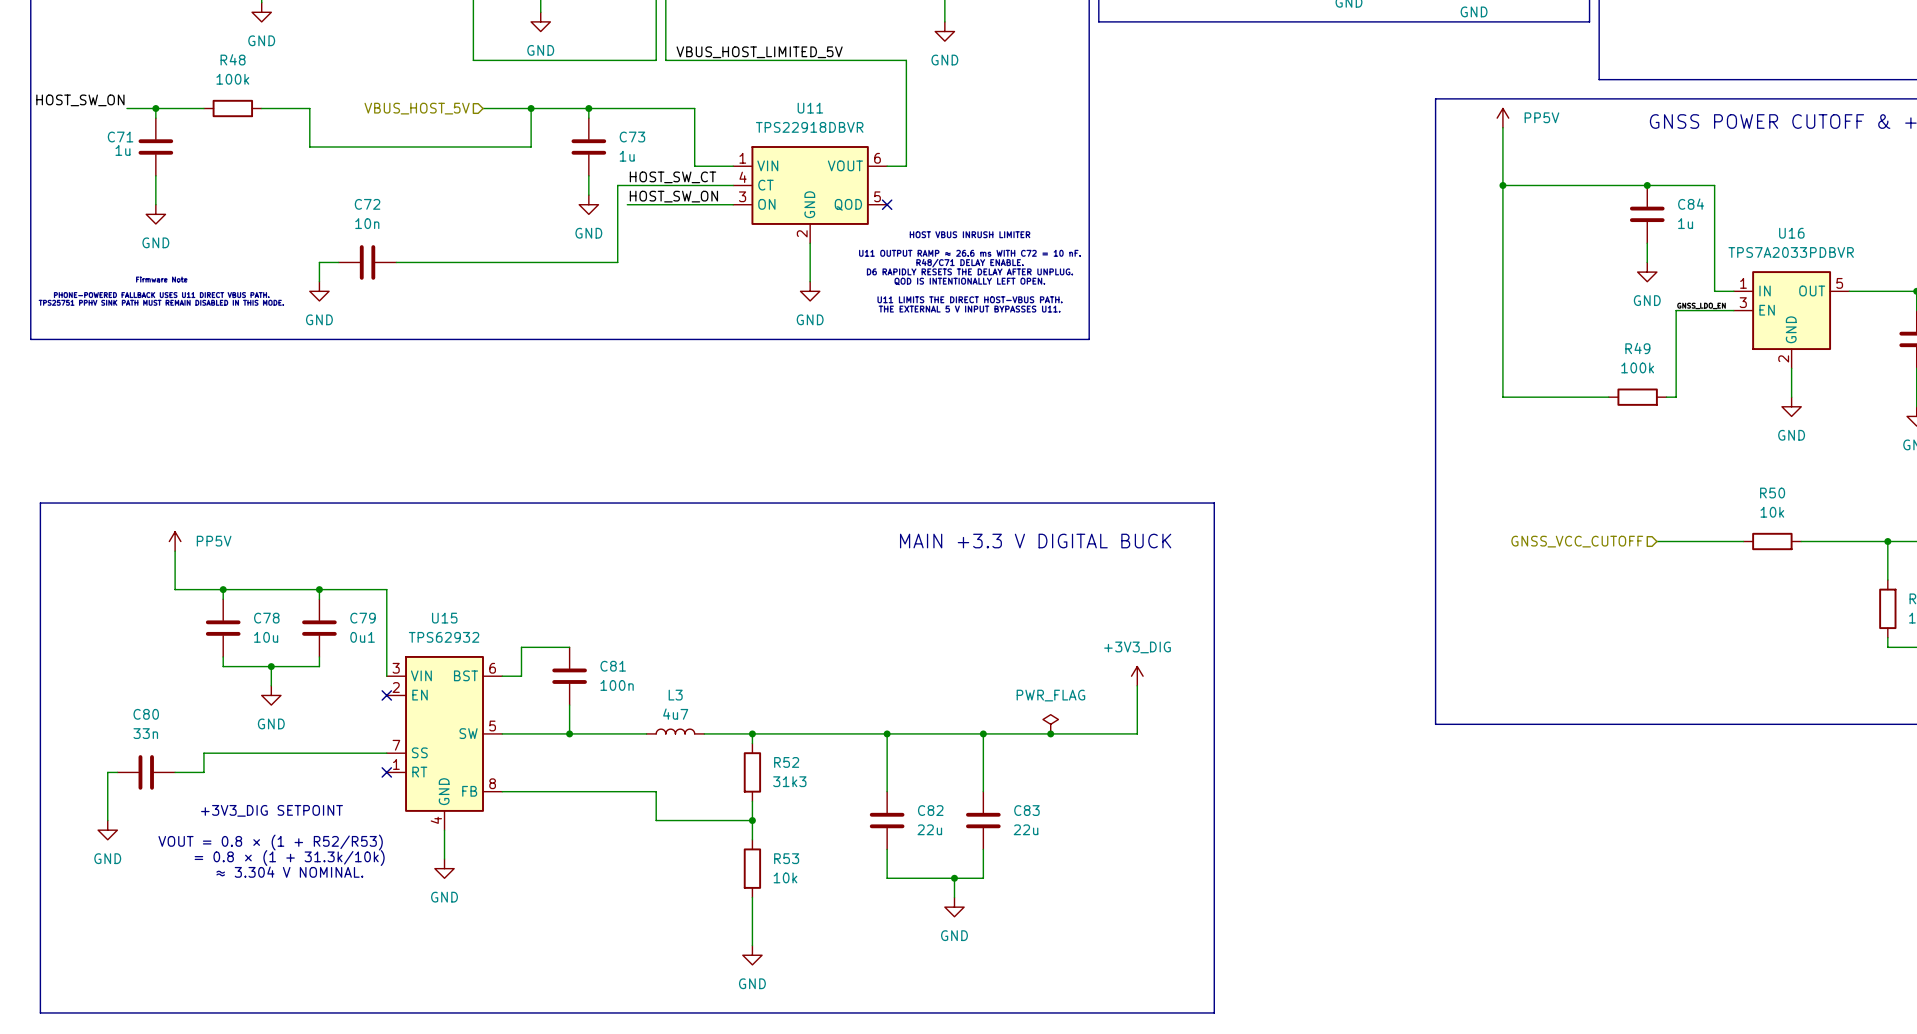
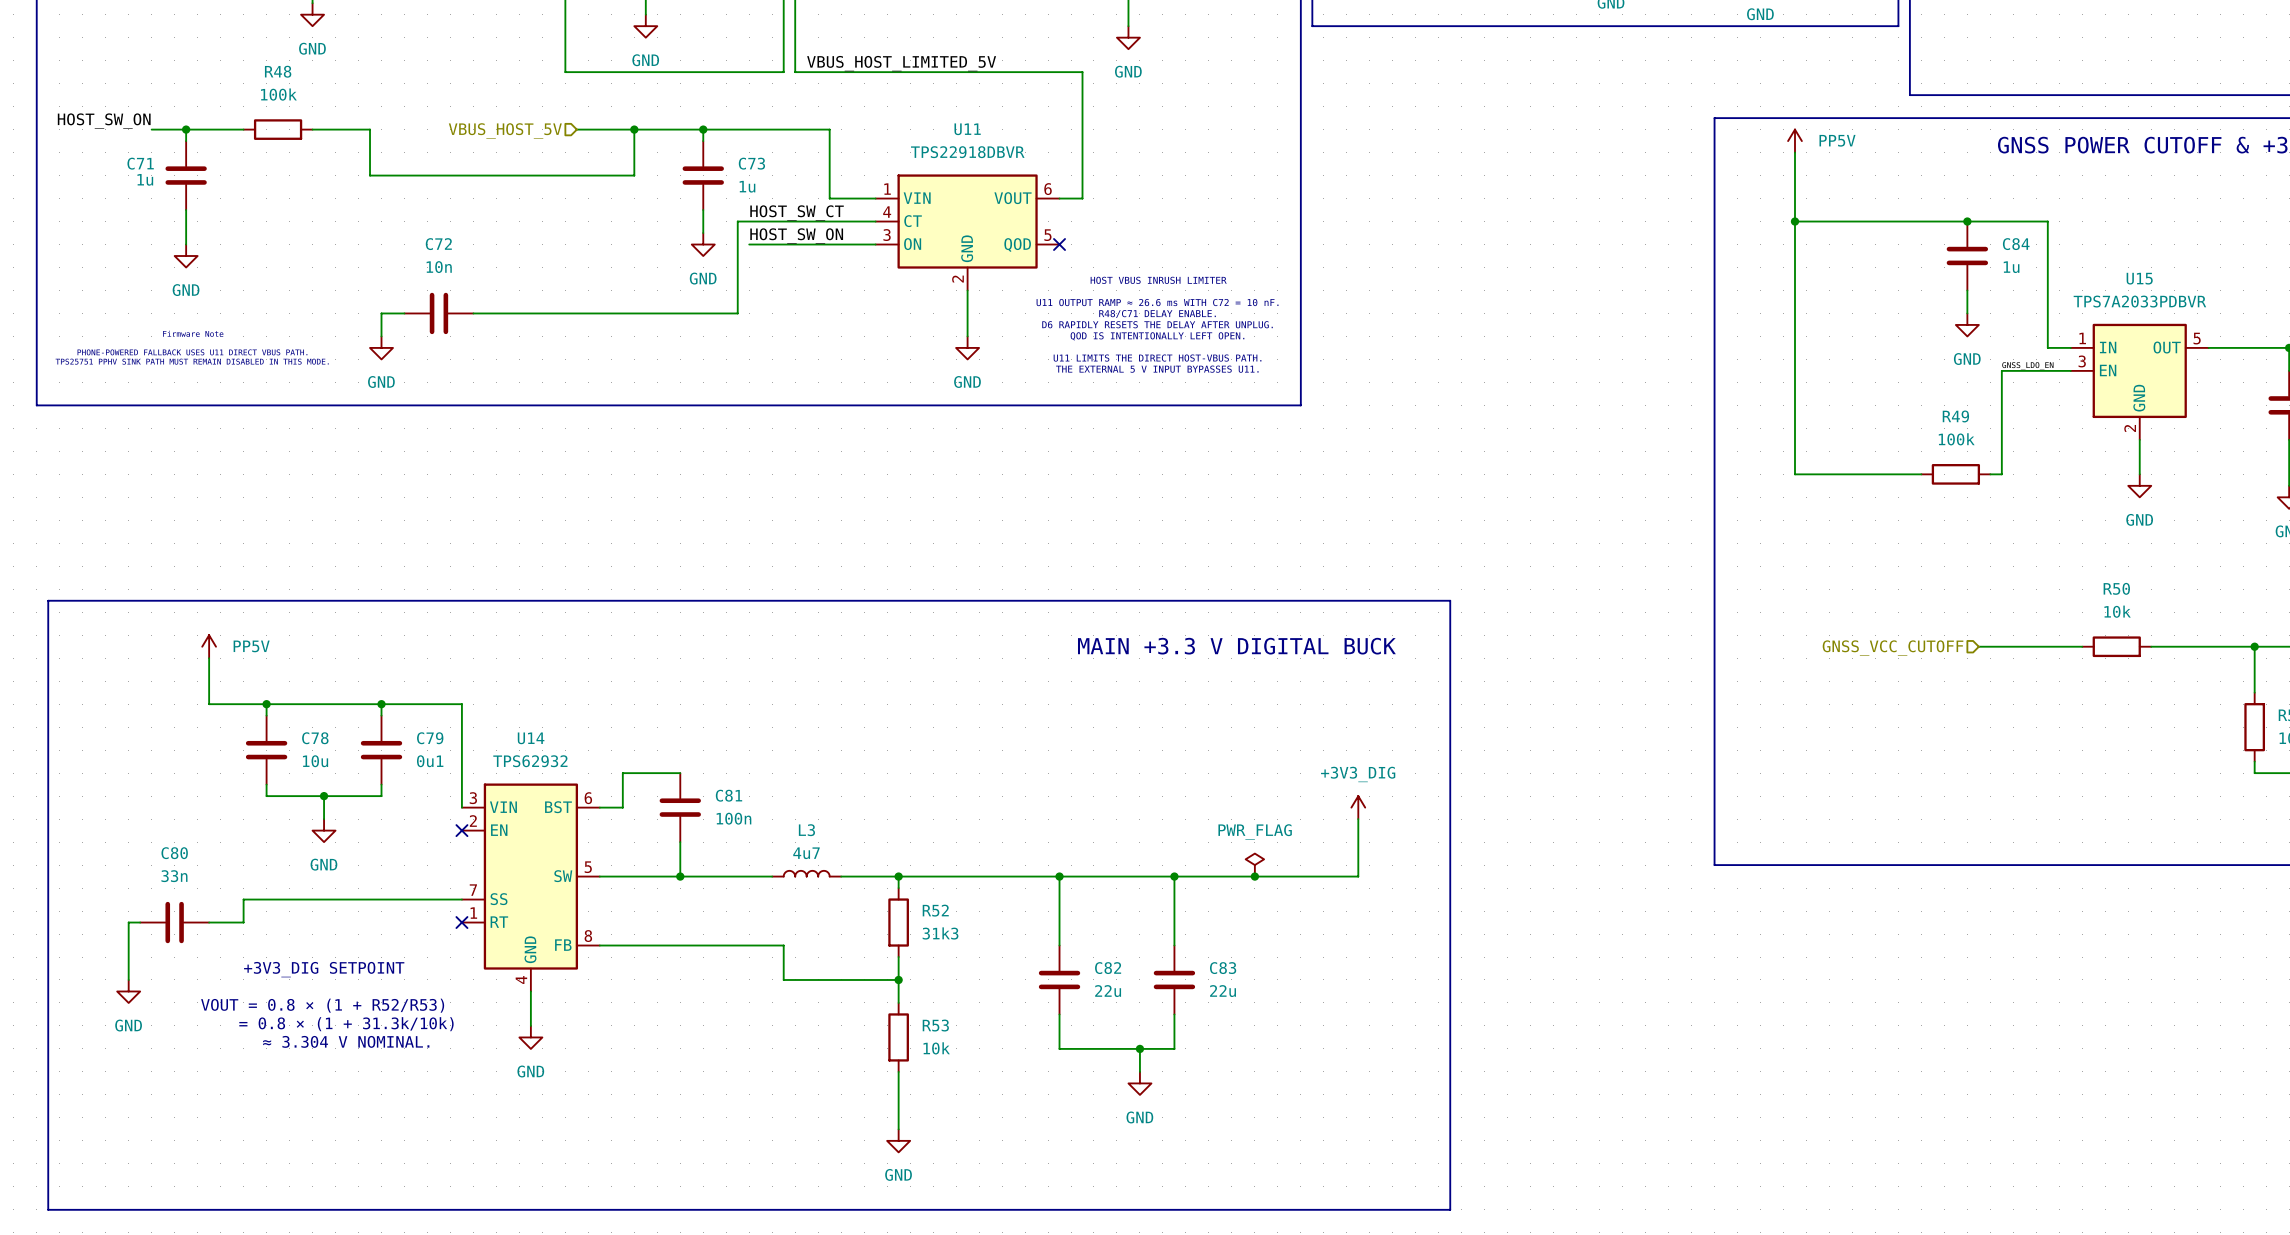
U16 name: U16 (1791, 233) -> U15 (2139, 278)
U15 name: U15 (444, 618) -> U14 (531, 738)

